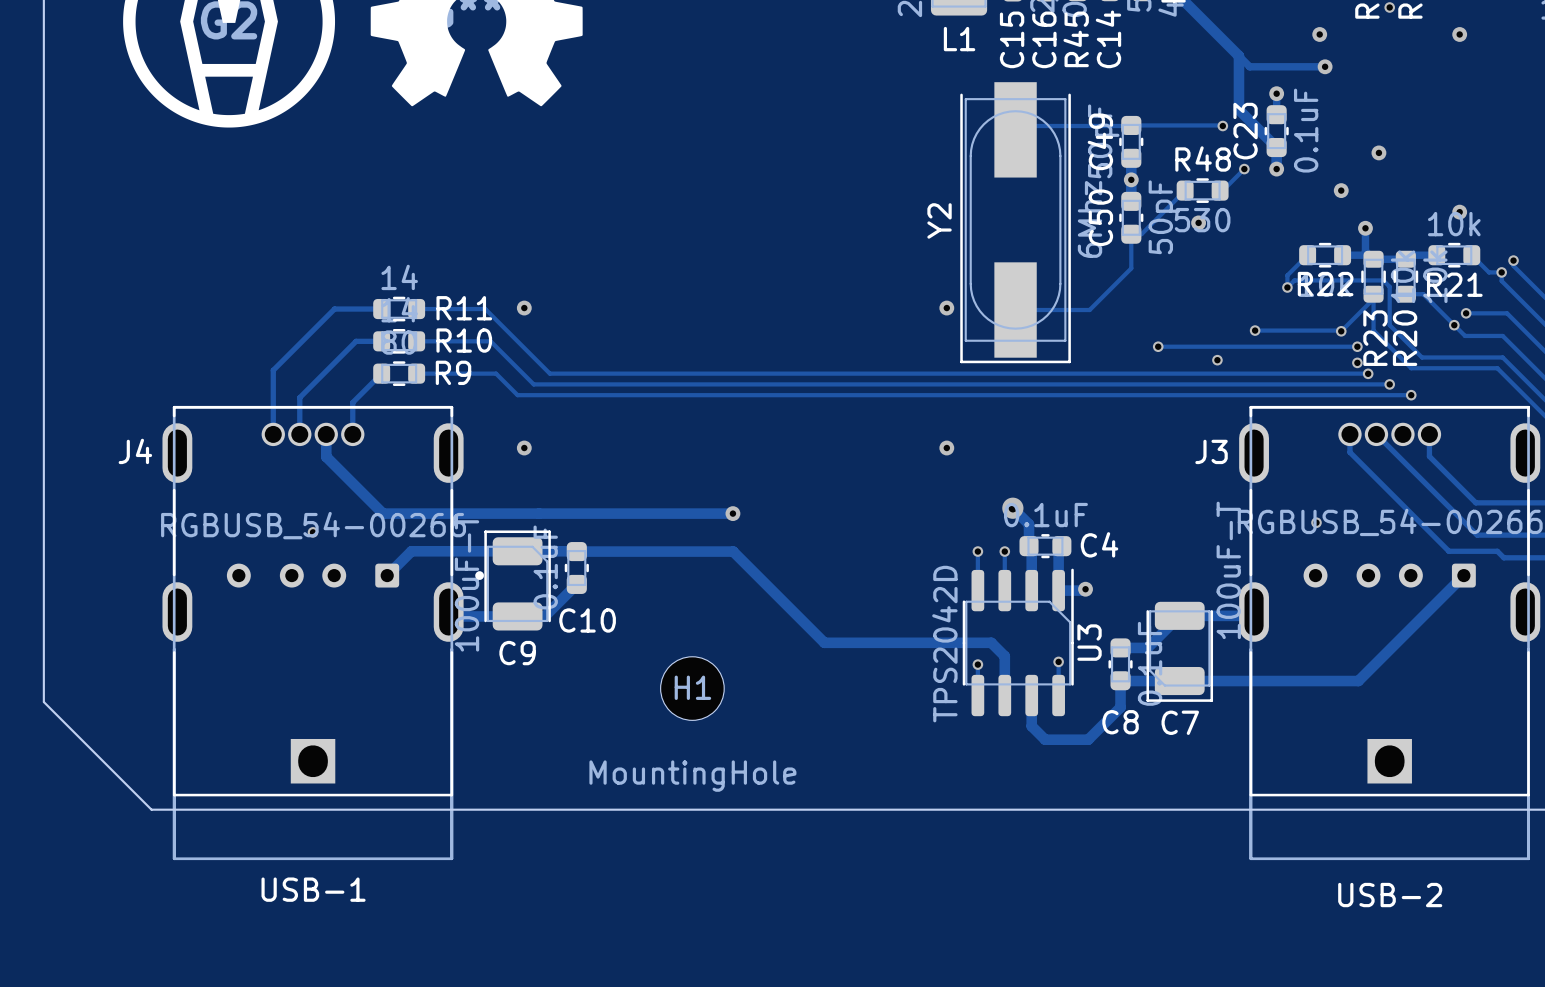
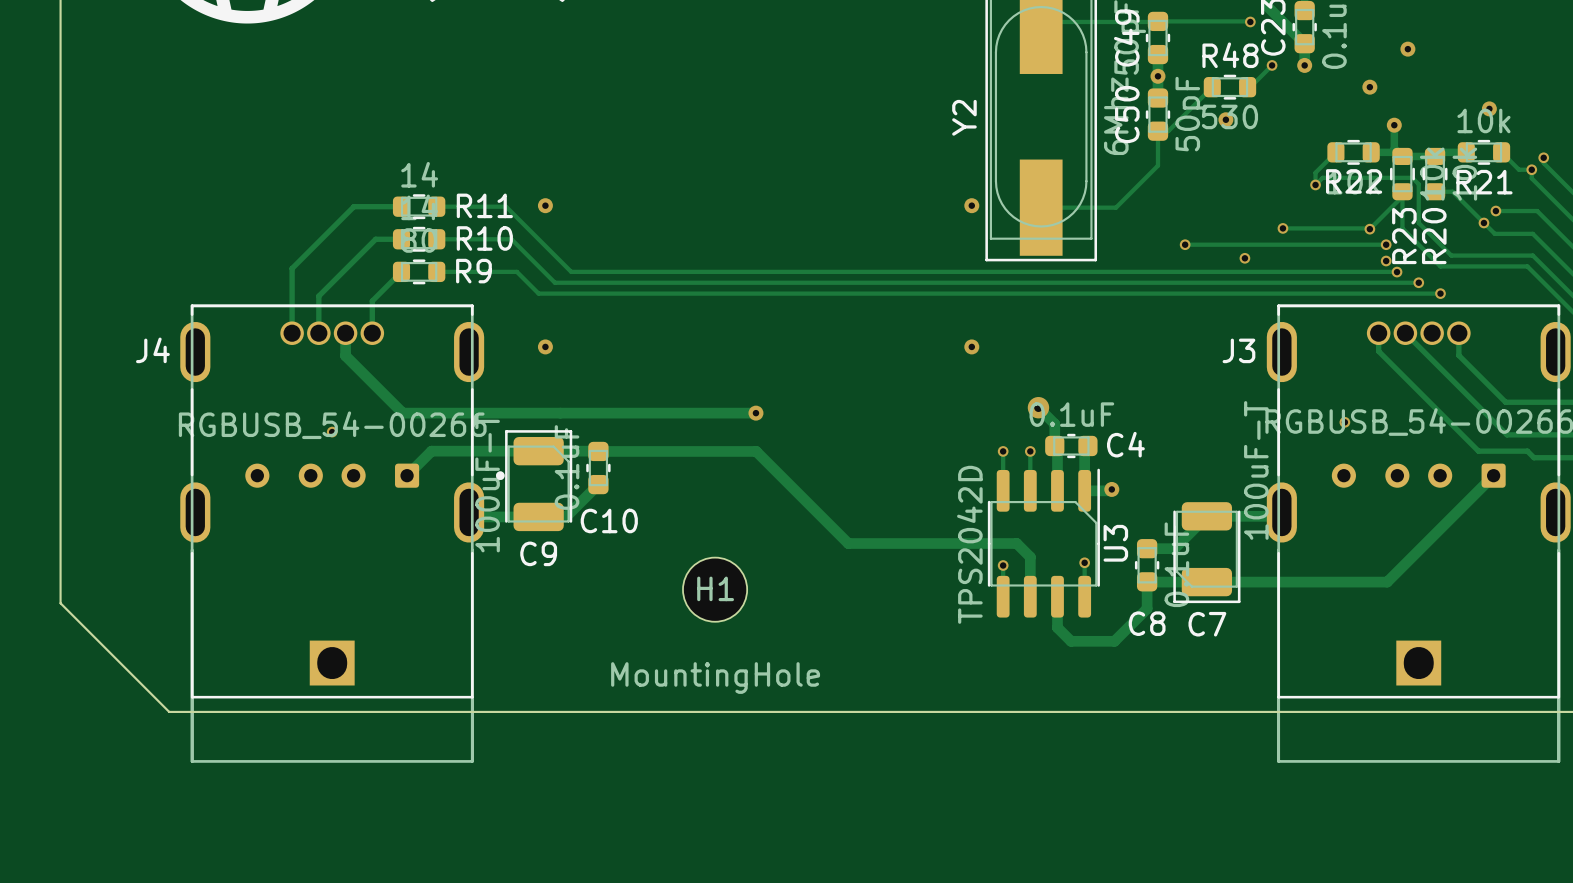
text: USB-1 (313, 889) -> none
text: USB-2 (1390, 895) -> none

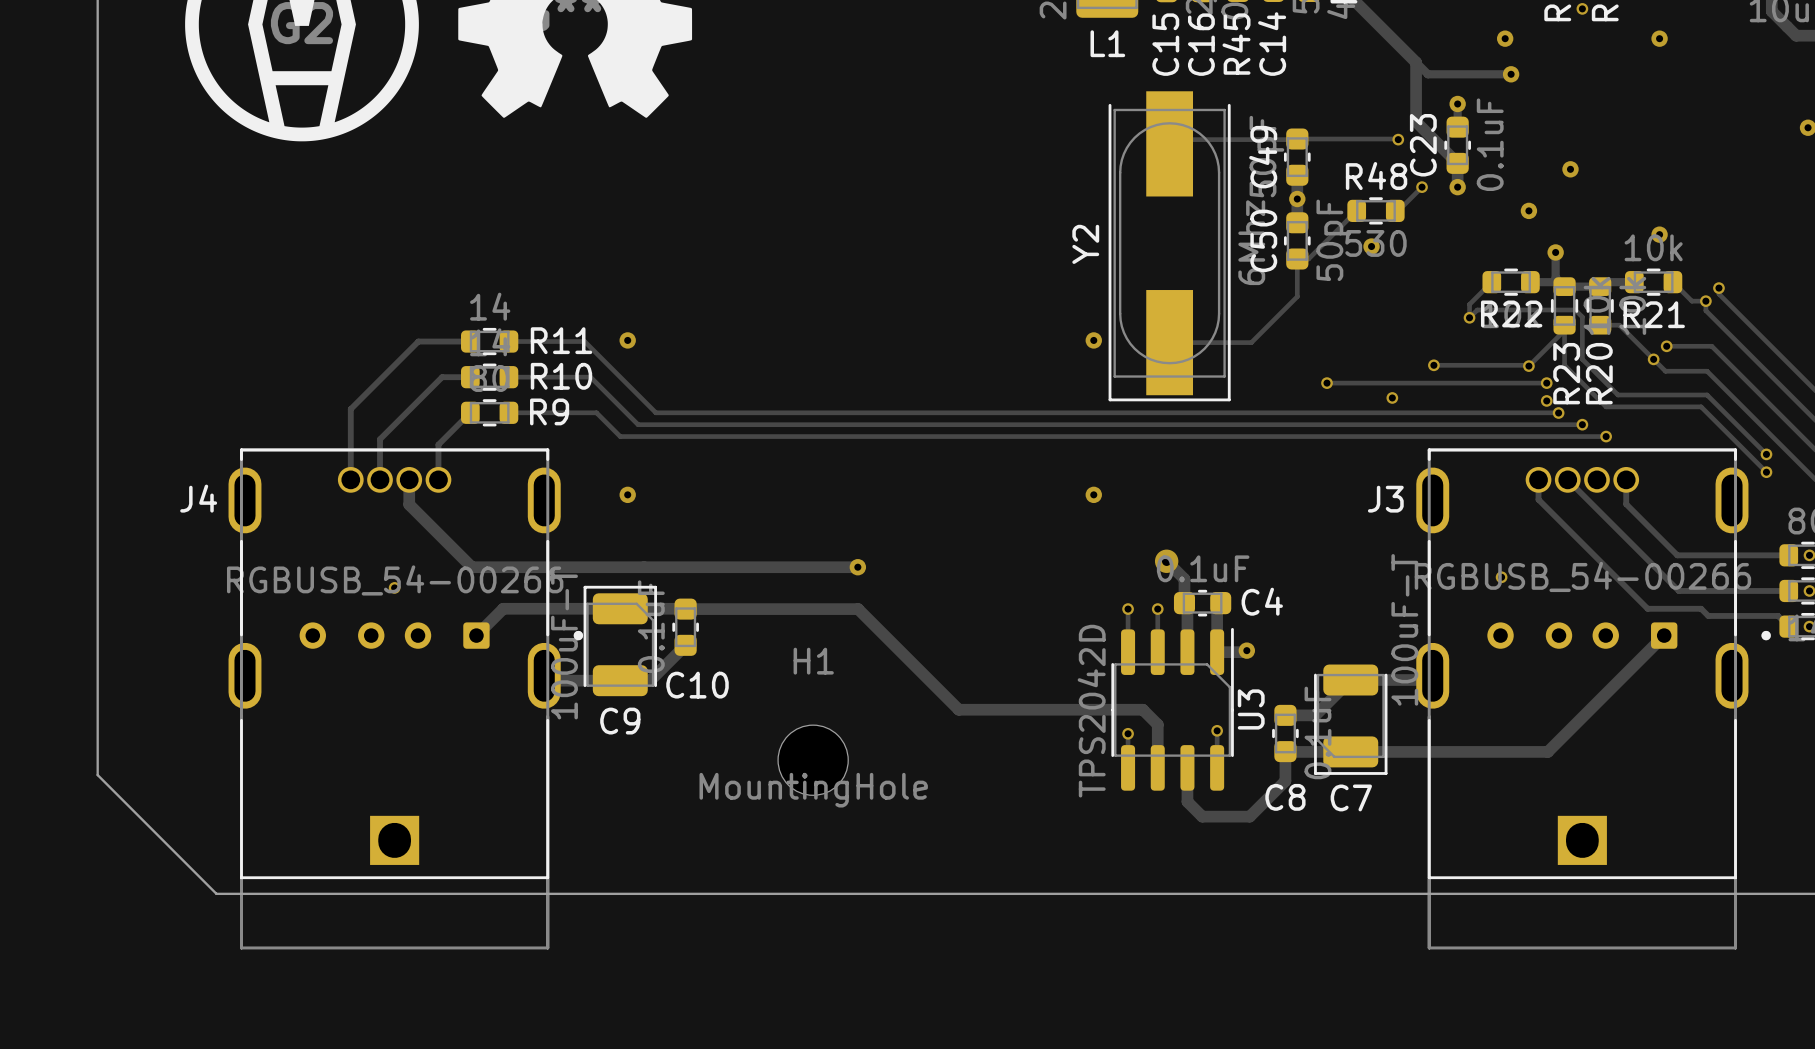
H1 name position: H1 (715, 588) -> H1 (813, 661)
H1 value position: MountingHole (715, 678) -> MountingHole (813, 790)

